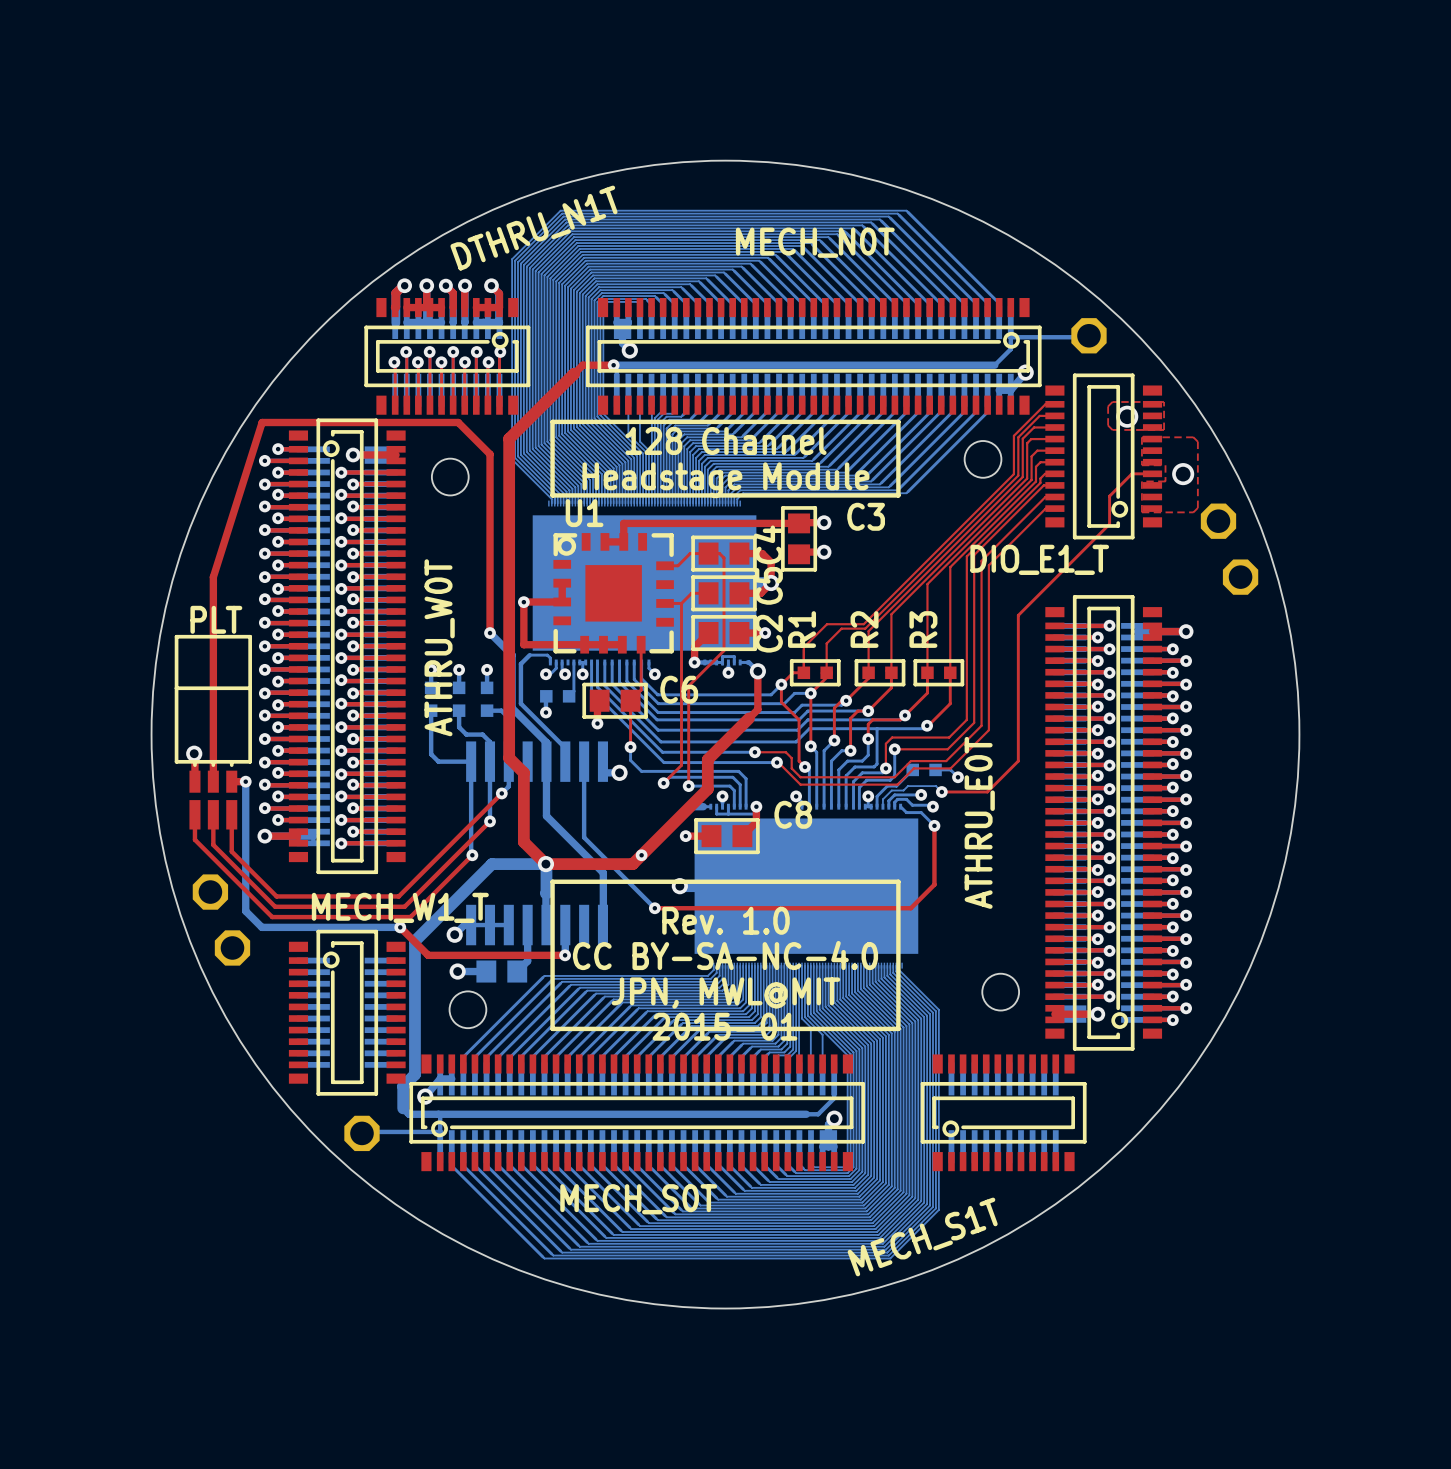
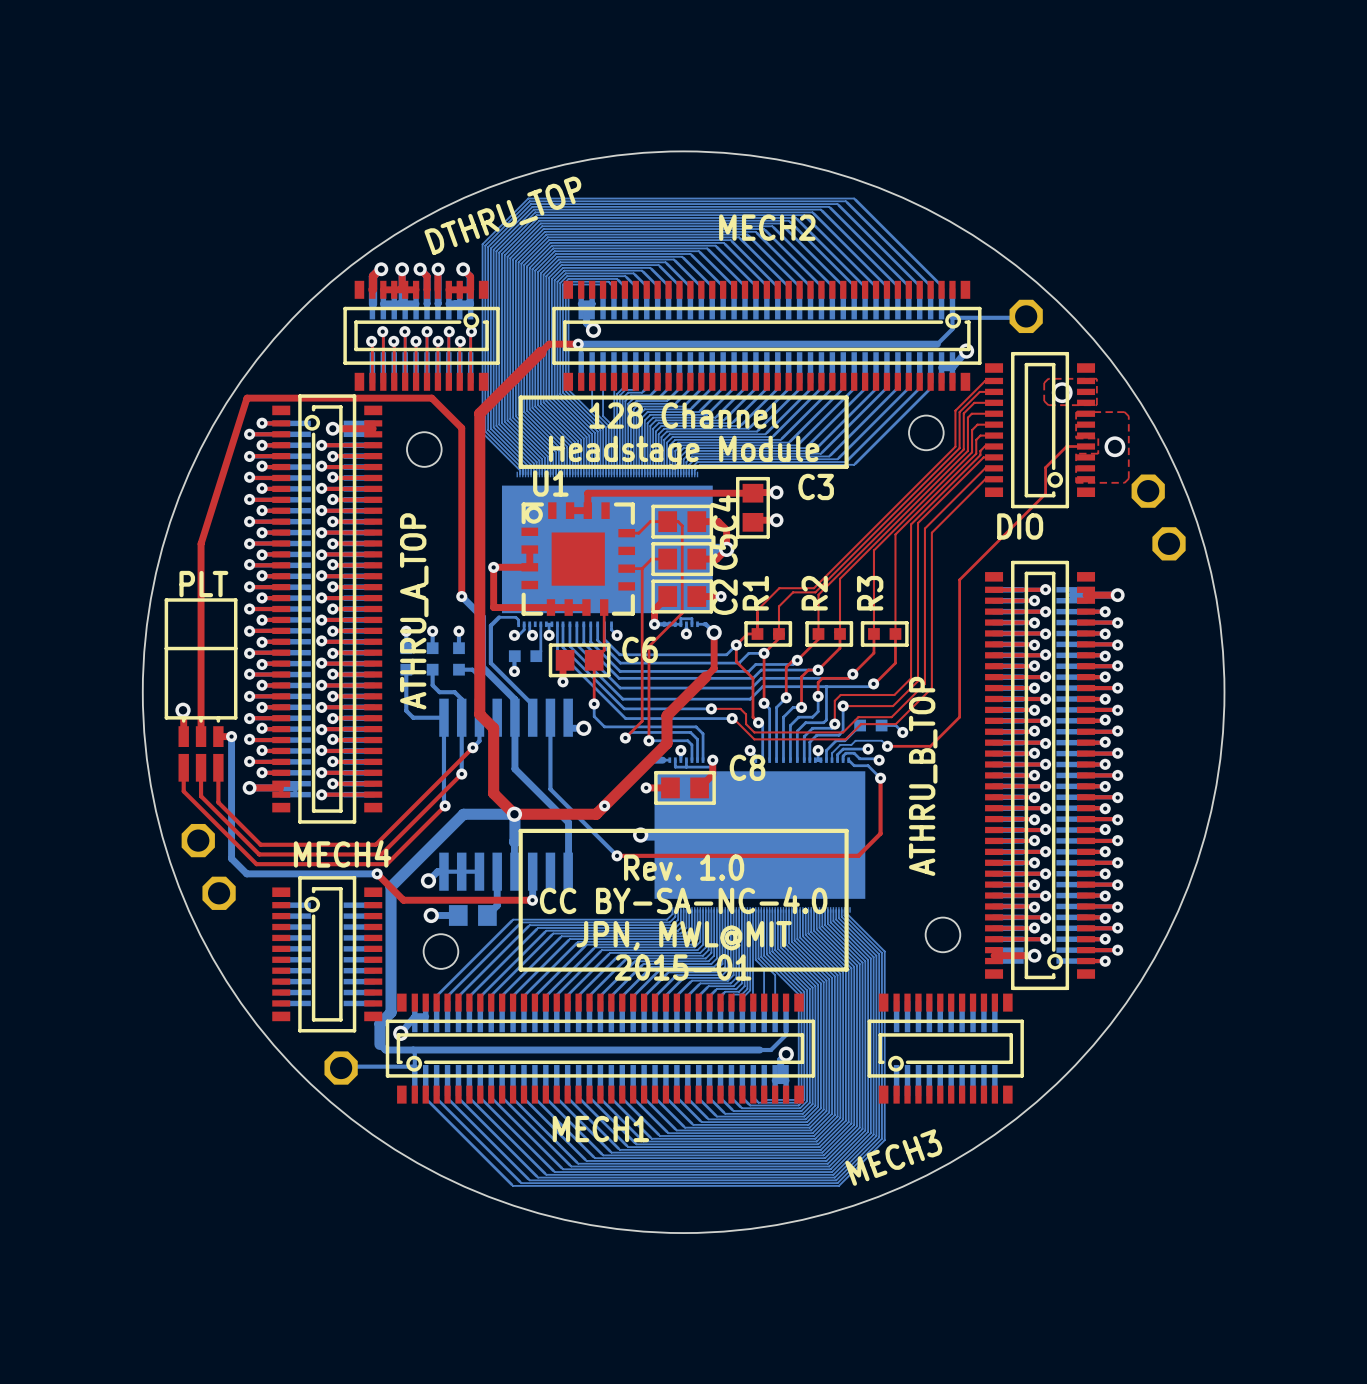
DTHRU_N1T name: DTHRU_N1T (533, 228) -> DTHRU_TOP (502, 215)
MECH_N0T name: MECH_N0T (815, 242) -> MECH2 (767, 227)
DIO_E1_T name: DIO_E1_T (1039, 559) -> DIO (1020, 526)
ATHRU_W0T name: ATHRU_W0T (439, 647) -> ATHRU_A_TOP (414, 611)
ATHRU_E0T name: ATHRU_E0T (979, 822) -> ATHRU_B_TOP (923, 776)
MECH_W1_T name: MECH_W1_T (400, 907) -> MECH4 (342, 853)
MECH_S0T name: MECH_S0T (638, 1199) -> MECH1 (600, 1129)
MECH_S1T name: MECH_S1T (922, 1236) -> MECH3 (893, 1157)

